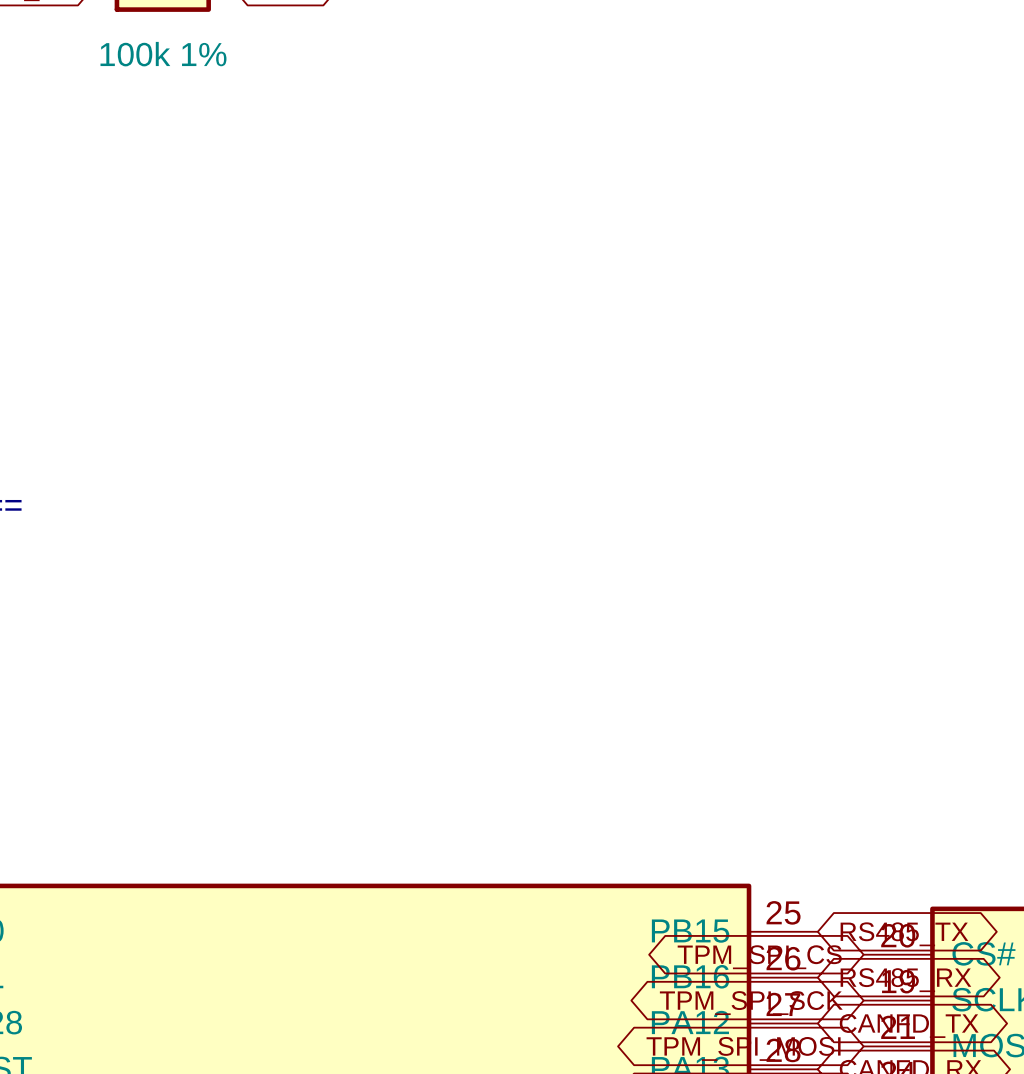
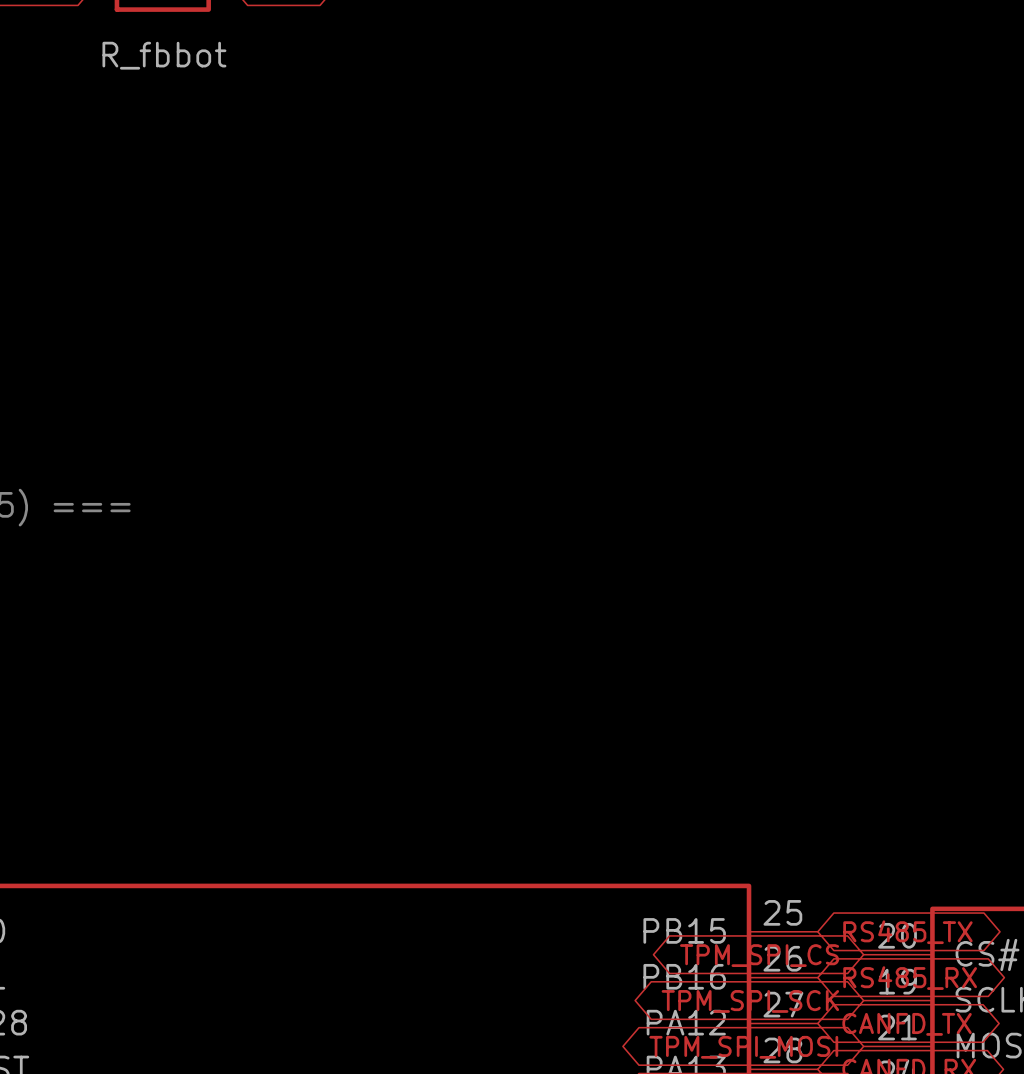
part value: 100k 1% (163, 54) -> R_fbbot (164, 55)

